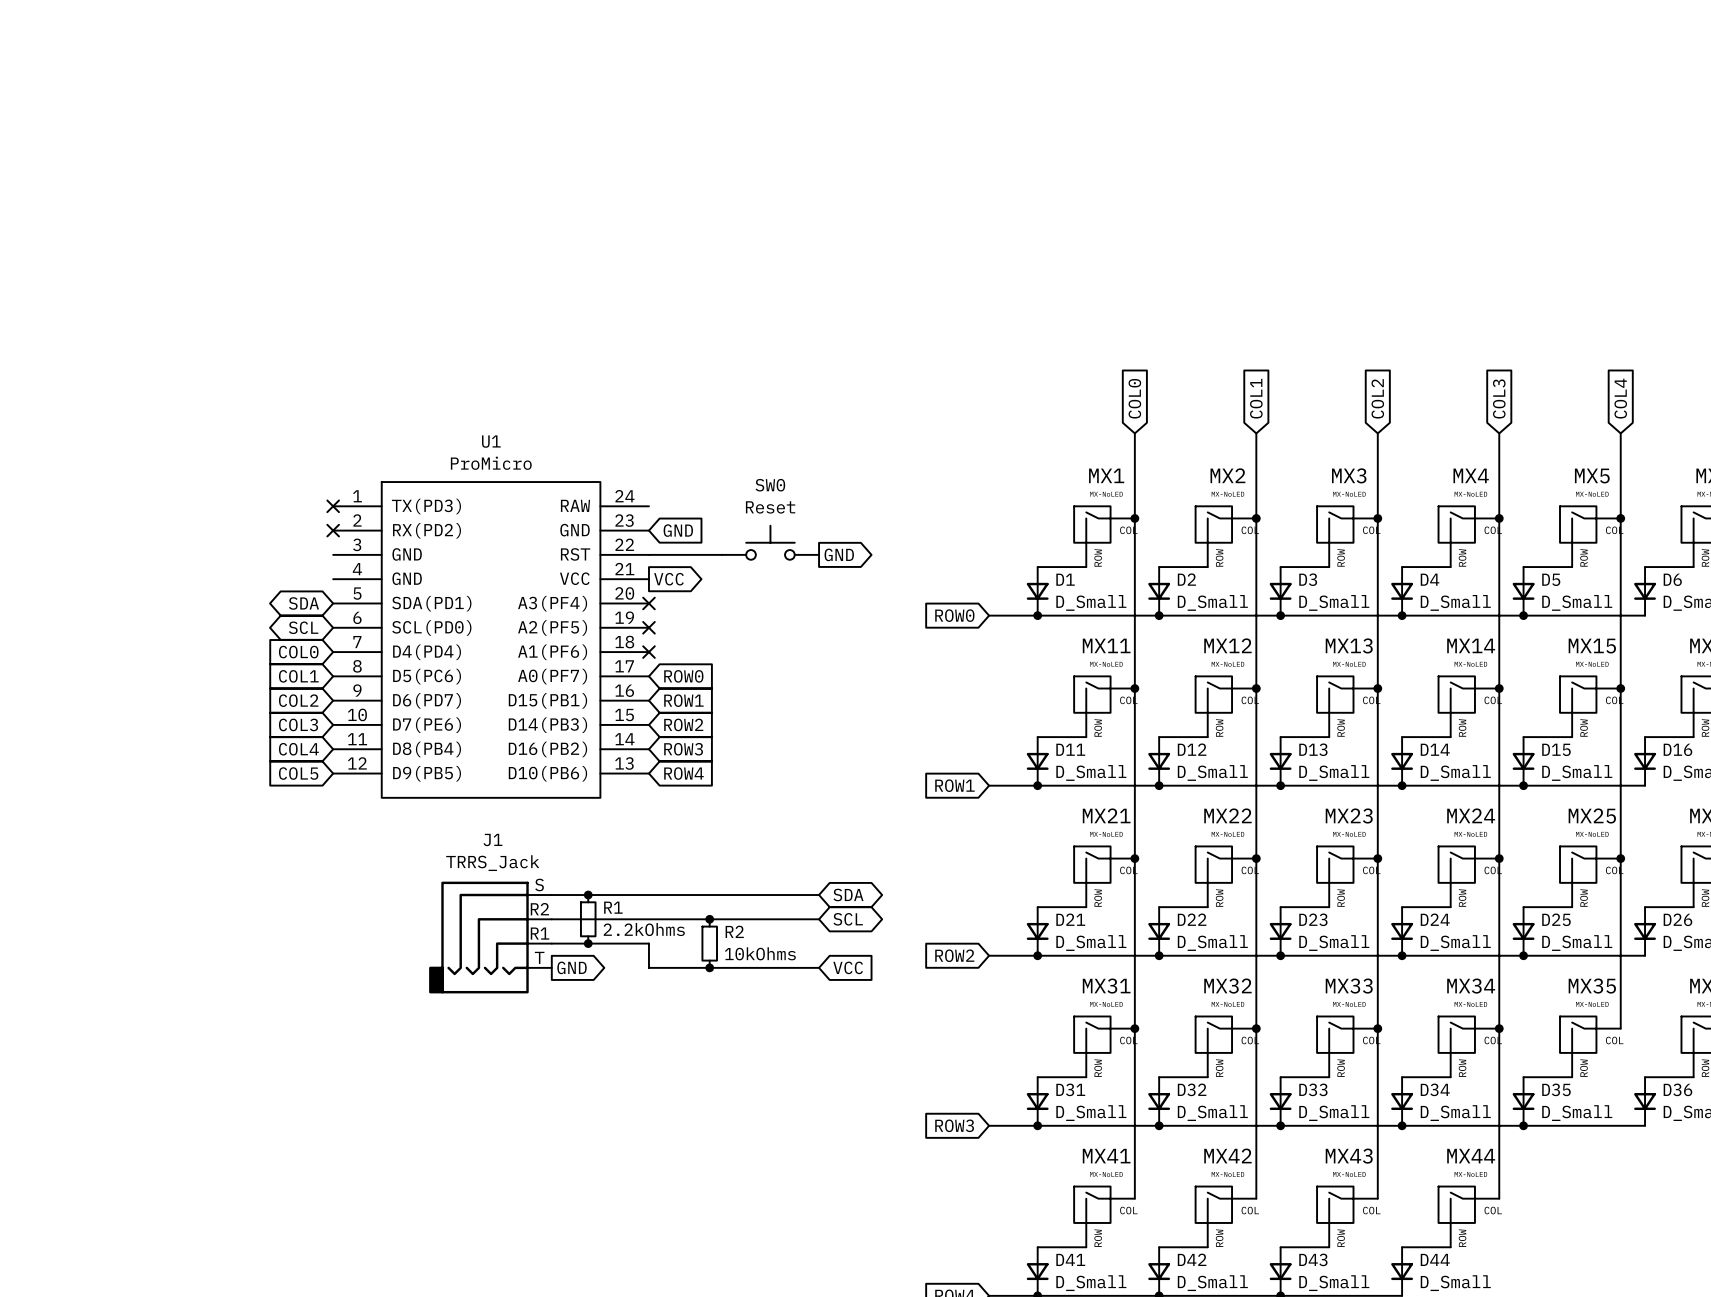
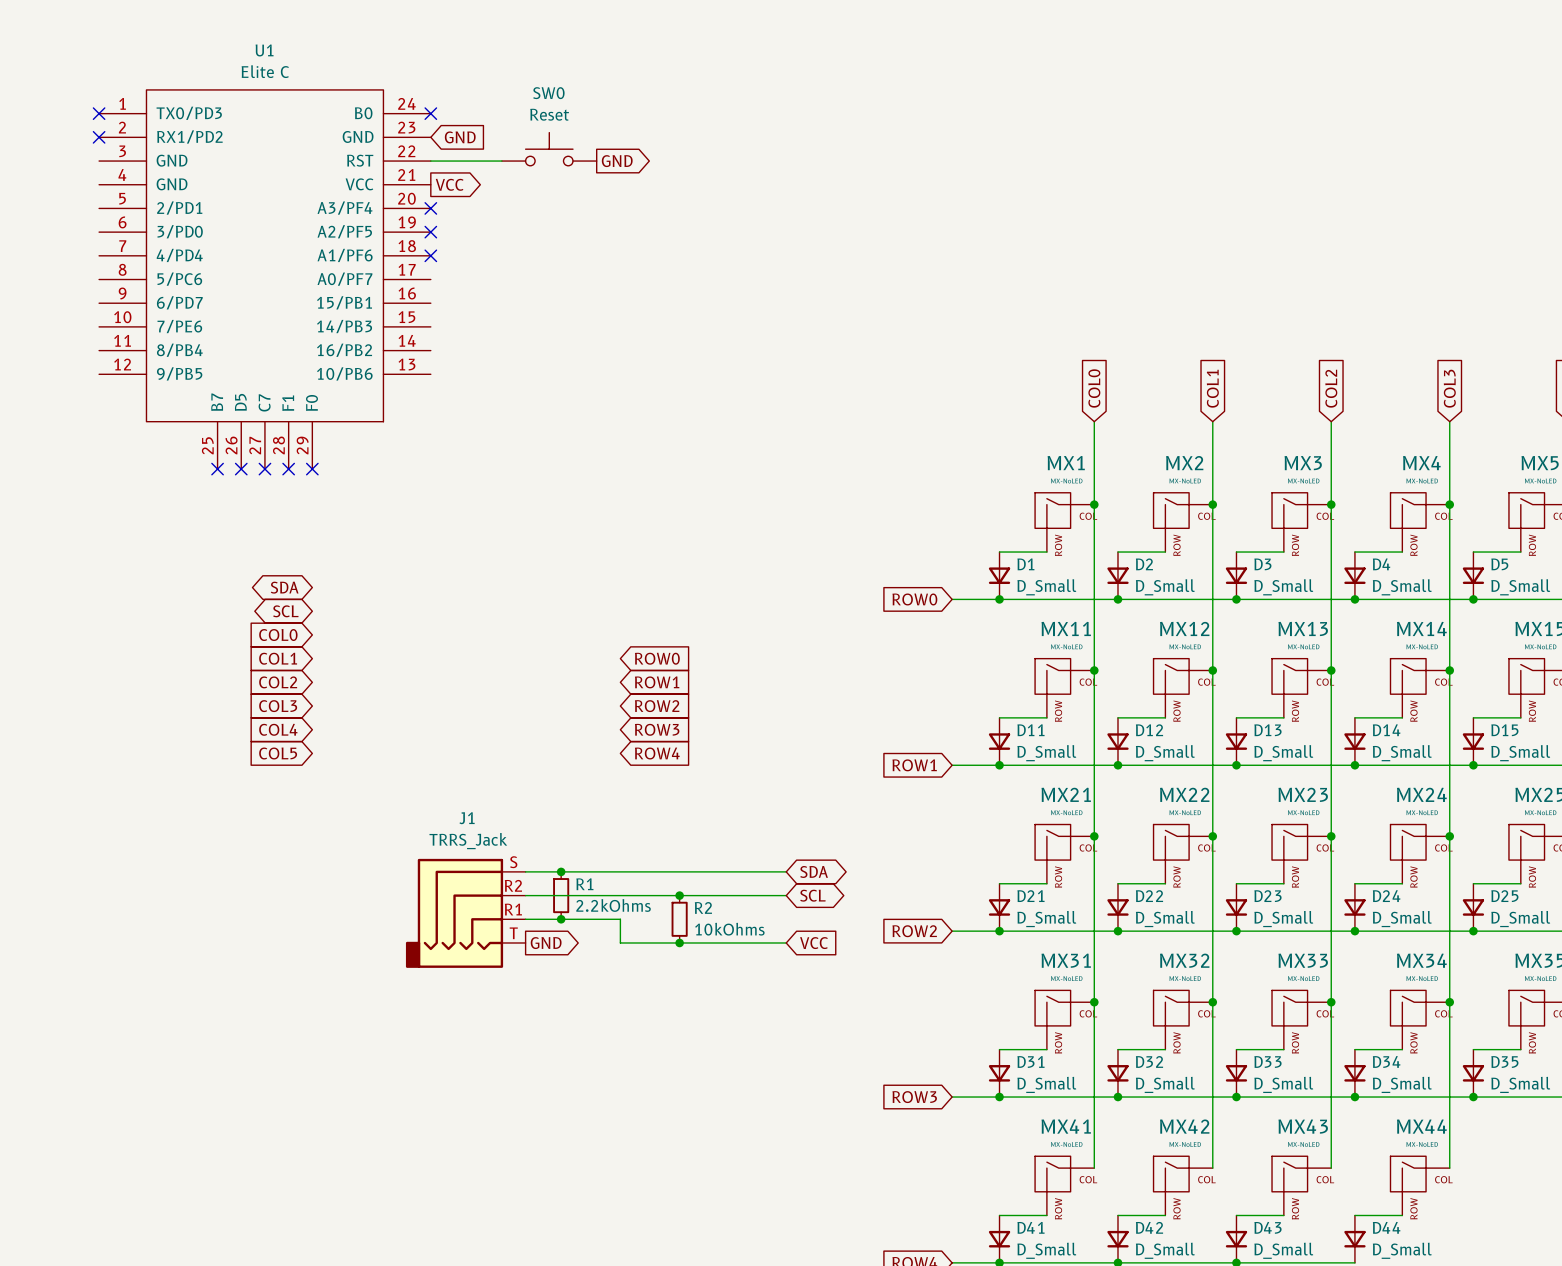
no-connect mark: none -> (99, 113)
no-connect mark: none -> (430, 113)
no-connect mark: none -> (99, 137)
global label: none -> GND (460, 137)
wire: none -> (430, 161) (501, 161)
global label: none -> GND (617, 161)
global label: none -> VCC (449, 184)
no-connect mark: none -> (430, 208)
no-connect mark: none -> (430, 232)
no-connect mark: none -> (430, 255)
U1 name position: U1 (491, 441) -> U1 (264, 50)
U1 value: ProMicro (491, 463) -> Elite C (265, 71)
no-connect mark: none -> (217, 469)
no-connect mark: none -> (241, 469)
no-connect mark: none -> (264, 469)
no-connect mark: none -> (288, 469)
U1 symbol: [333, 482, 649, 798] -> [99, 89, 431, 470]
no-connect mark: none -> (312, 469)
no-connect mark: (333, 506) -> none
no-connect mark: (333, 530) -> none
global label: GND (678, 530) -> none
SW0 position: (770, 542) -> (549, 149)
wire: (648, 554) (721, 554) -> none
global label: GND (839, 554) -> none
global label: VCC (668, 579) -> none
no-connect mark: (648, 603) -> none
no-connect mark: (648, 627) -> none
no-connect mark: (648, 652) -> none

